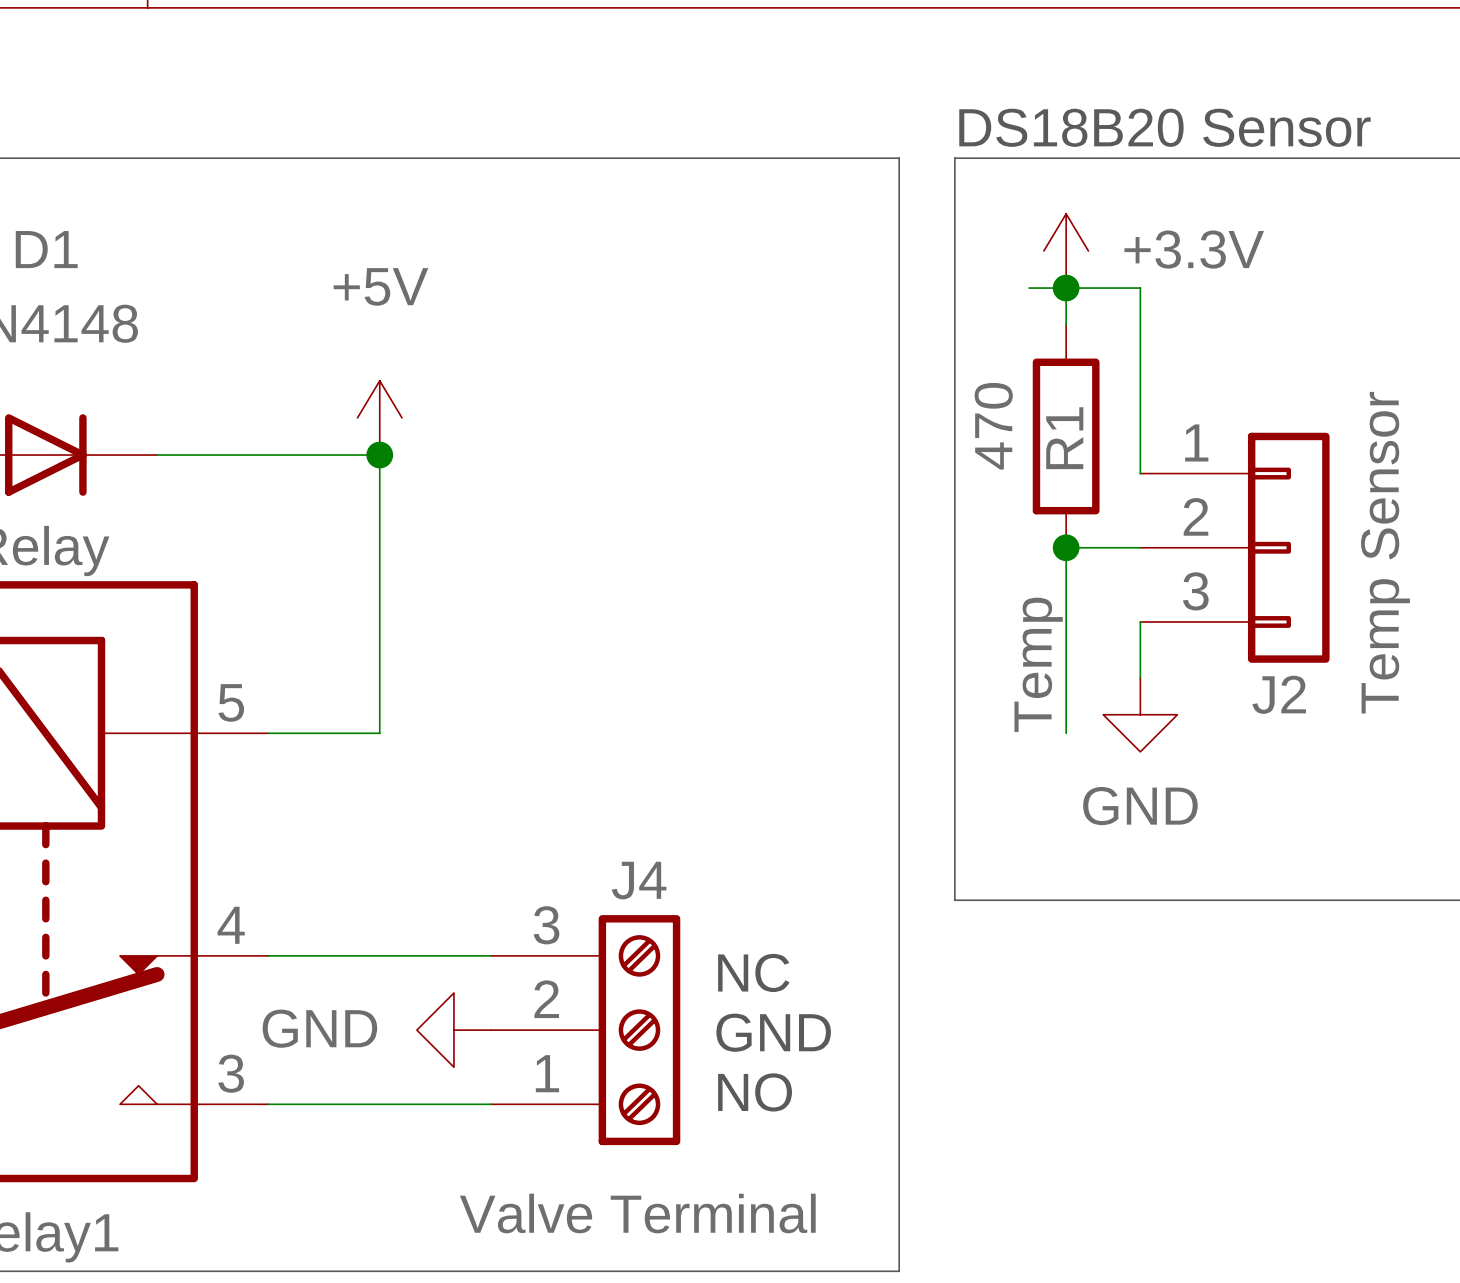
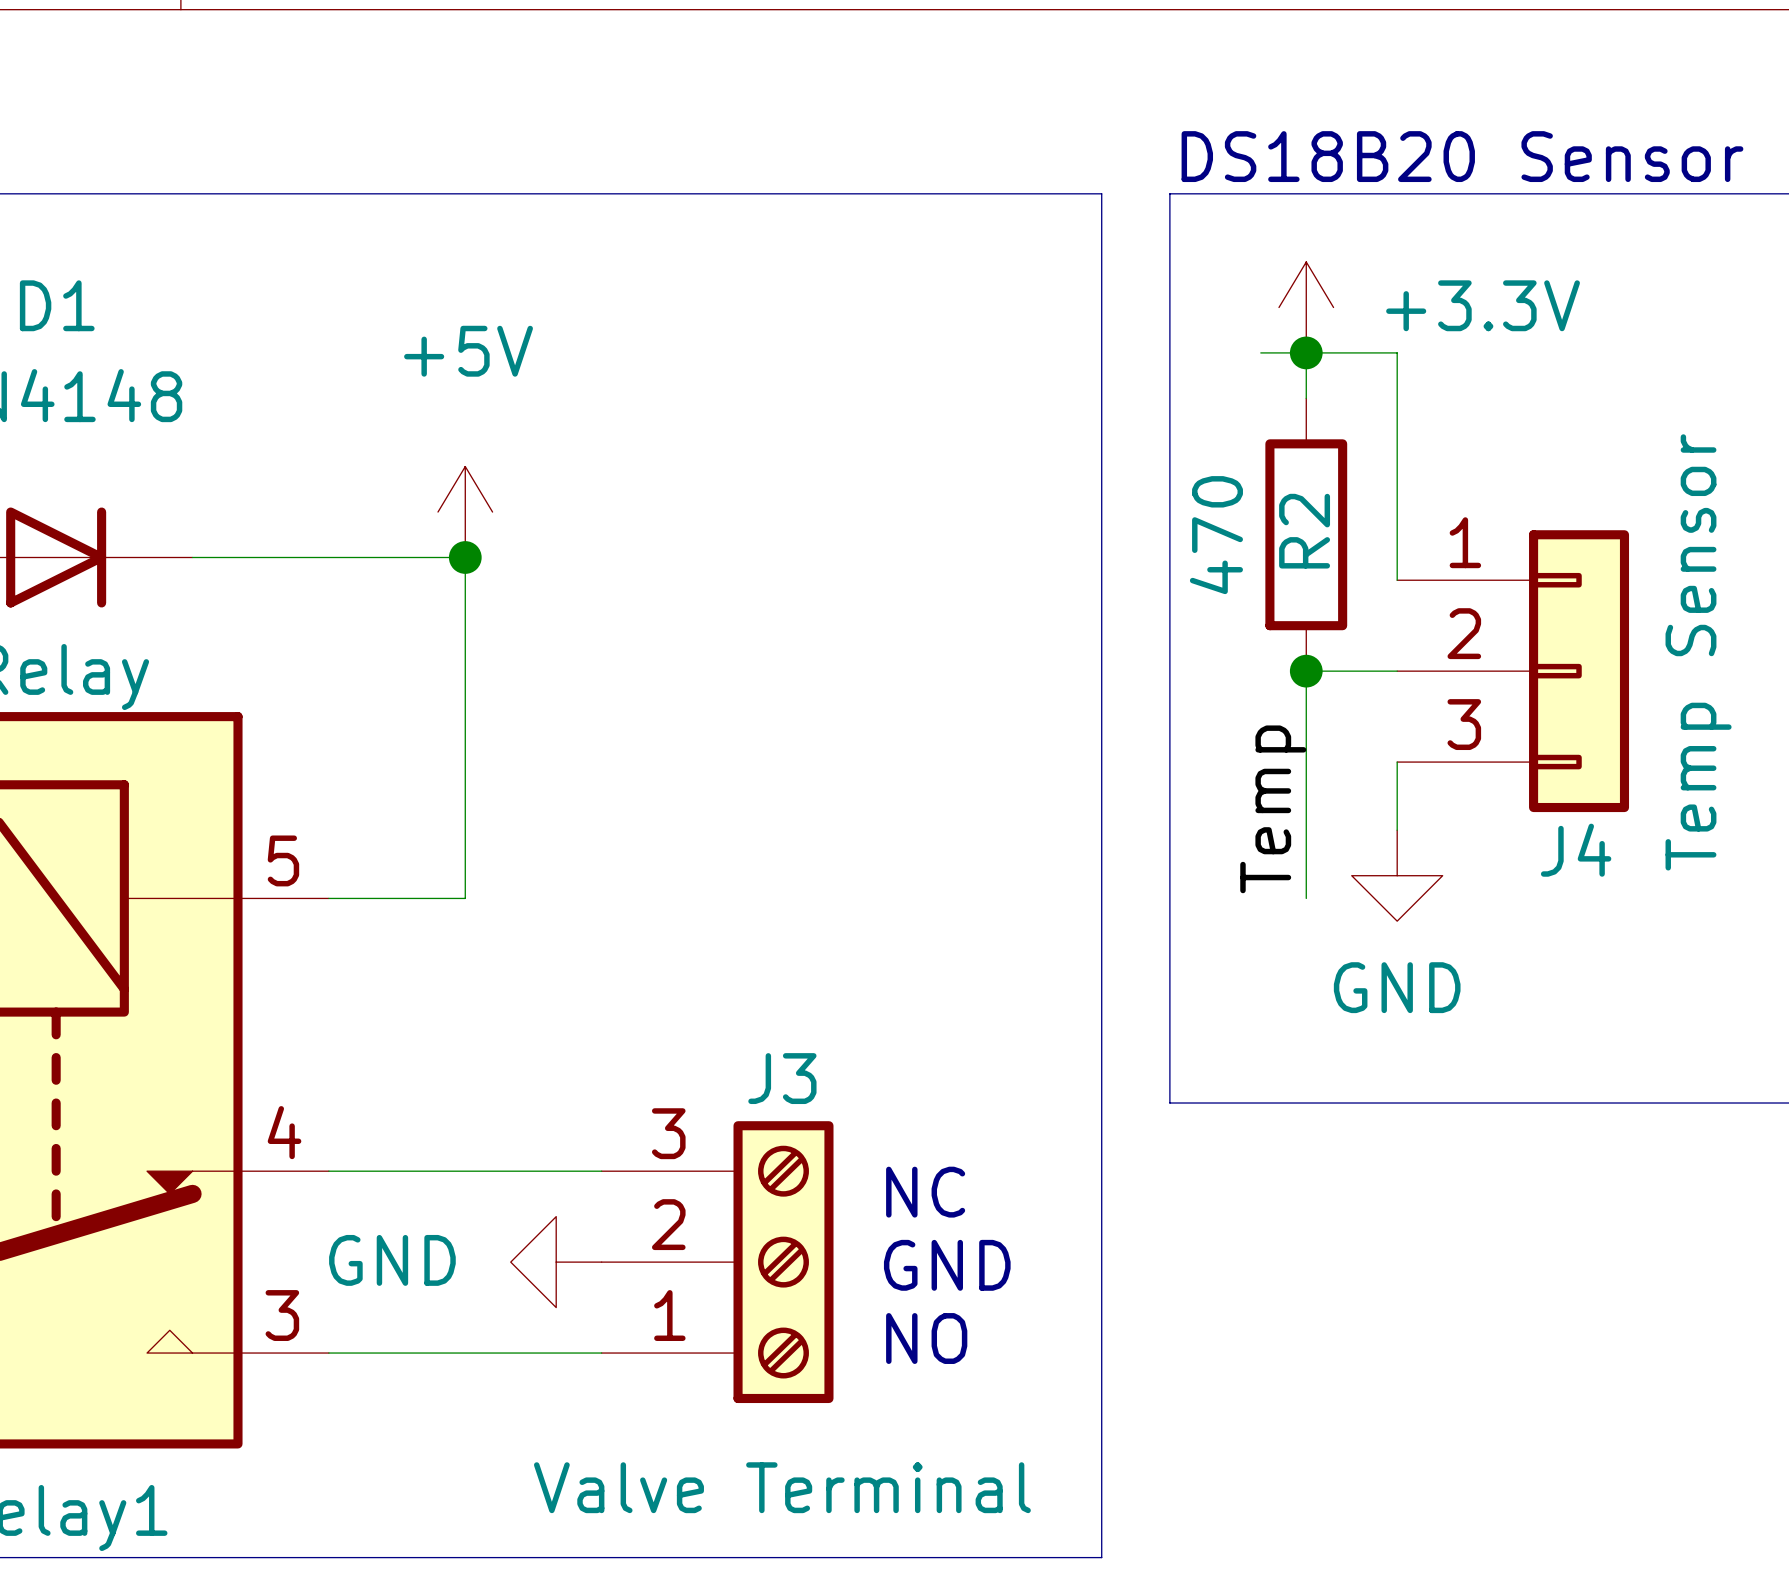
R1 name: R1 (1064, 438) -> R2 (1304, 531)
J2 name: J2 (1279, 694) -> J4 (1576, 850)
J4 name: J4 (639, 880) -> J3 (782, 1078)

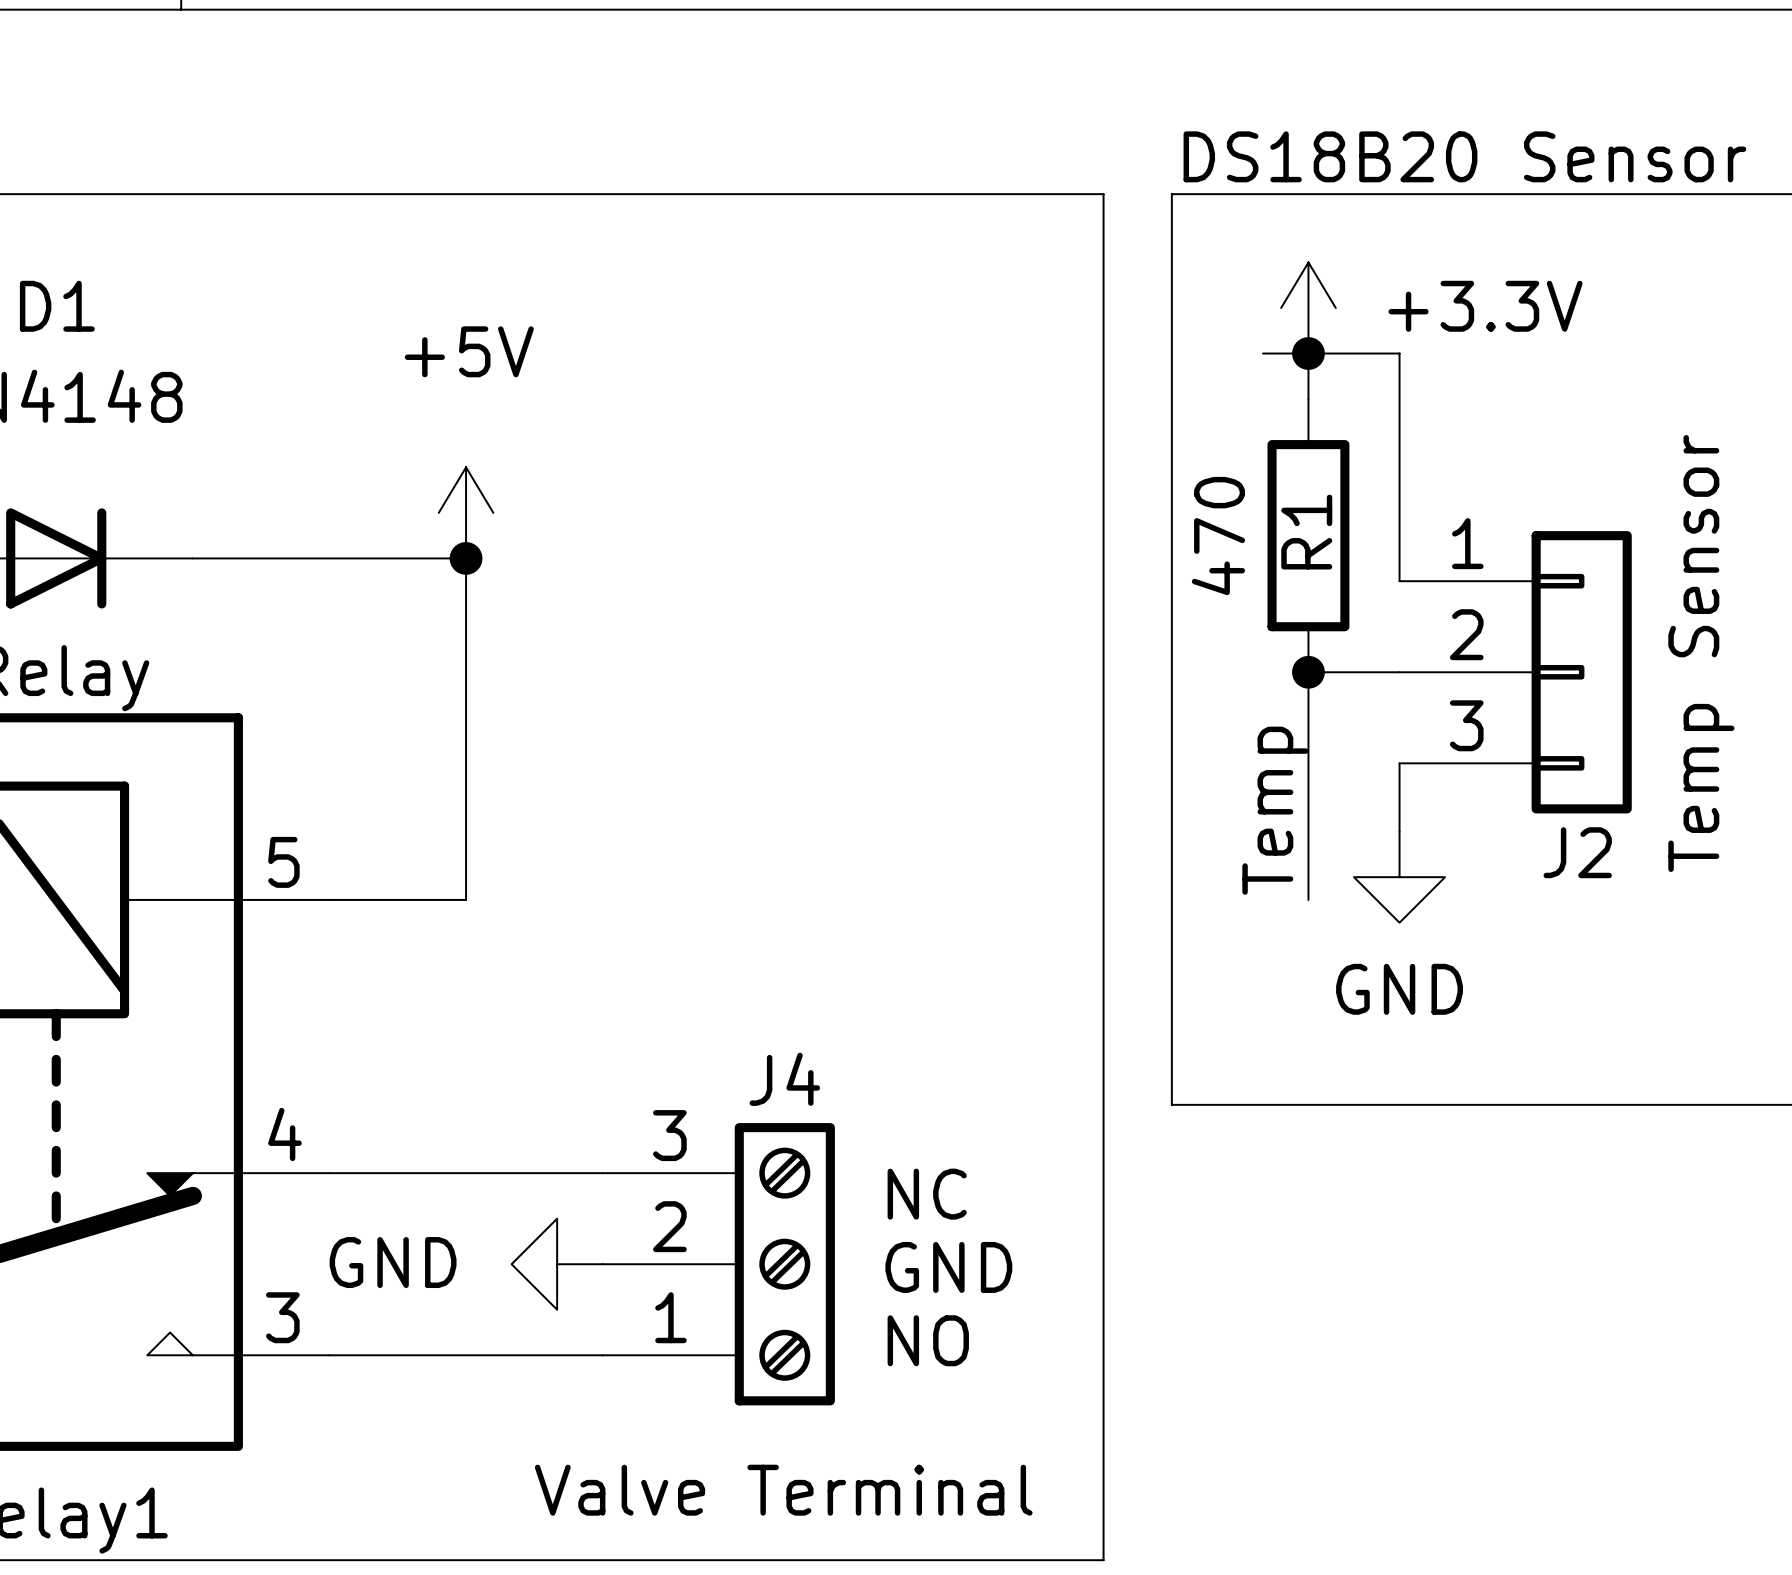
R2 name: R2 (1304, 531) -> R1 (1306, 532)
J4 name: J4 (1576, 850) -> J2 (1577, 852)
J3 name: J3 (782, 1078) -> J4 (784, 1079)

